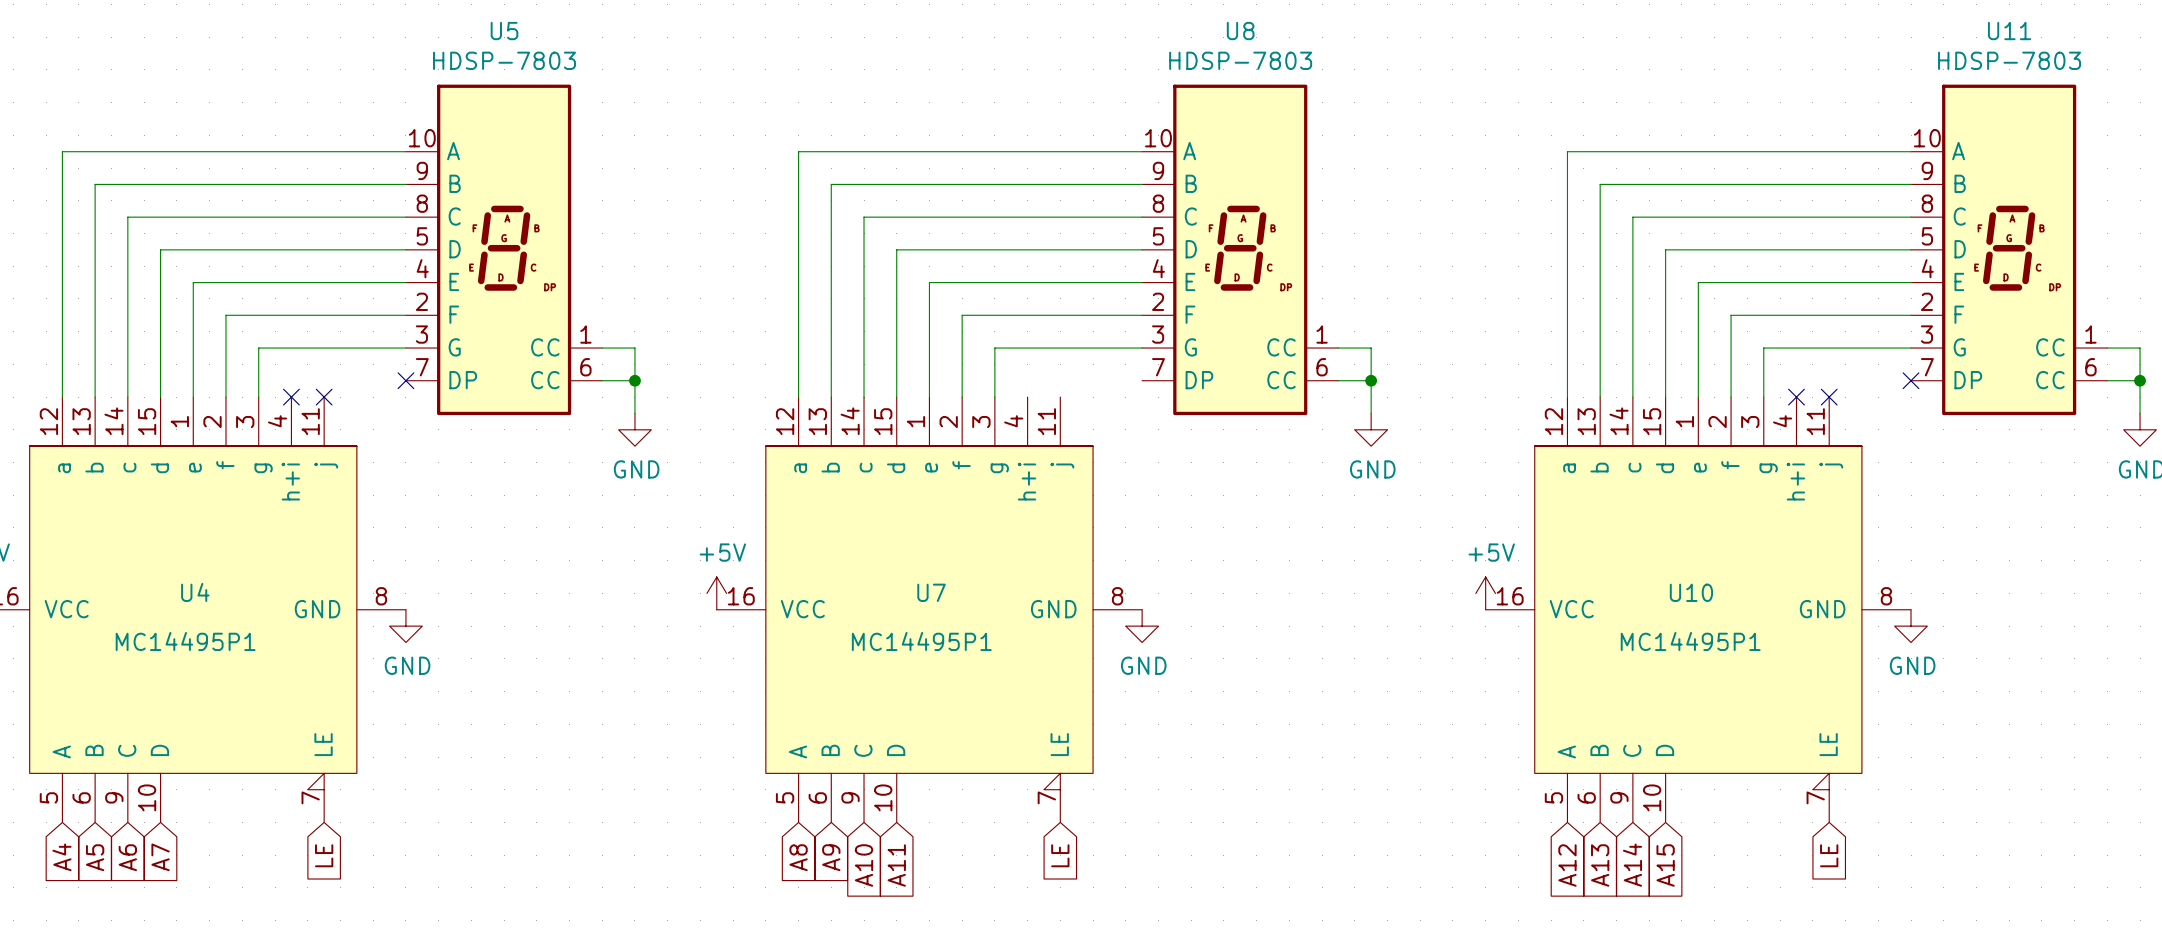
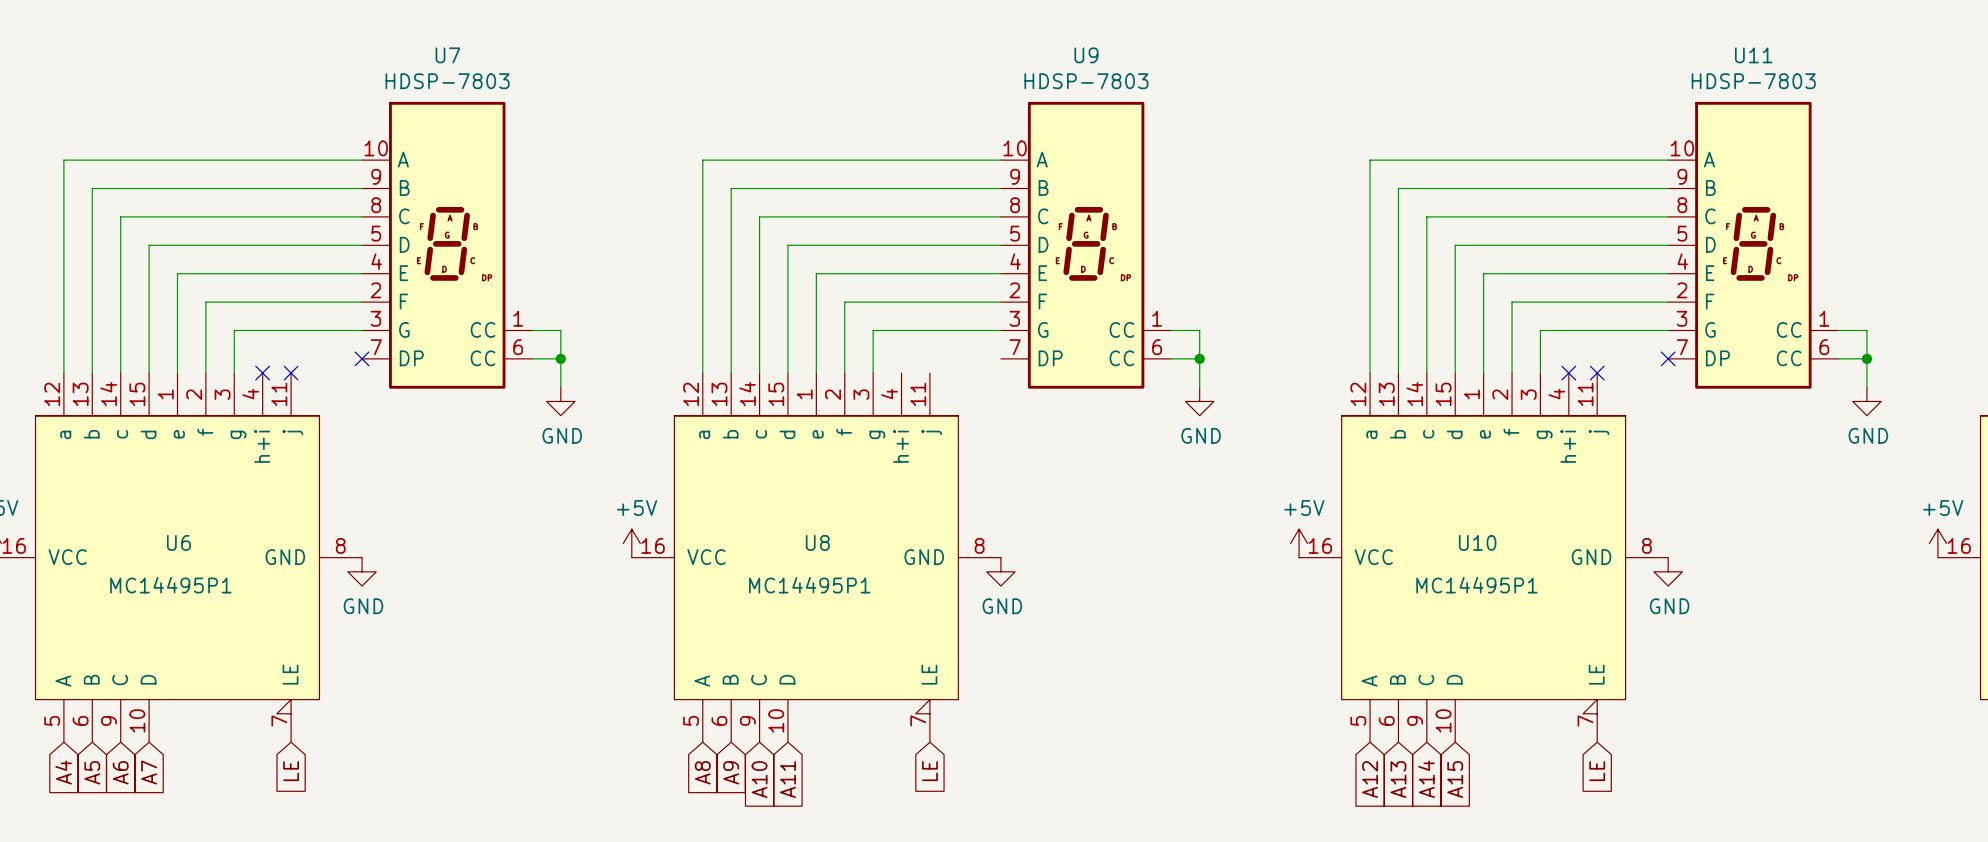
U5 name: U5 (504, 31) -> U7 (447, 55)
U8 name: U8 (1240, 31) -> U9 (1086, 55)
U4 name: U4 (195, 592) -> U6 (178, 542)
U7 name: U7 (931, 592) -> U8 (817, 542)

